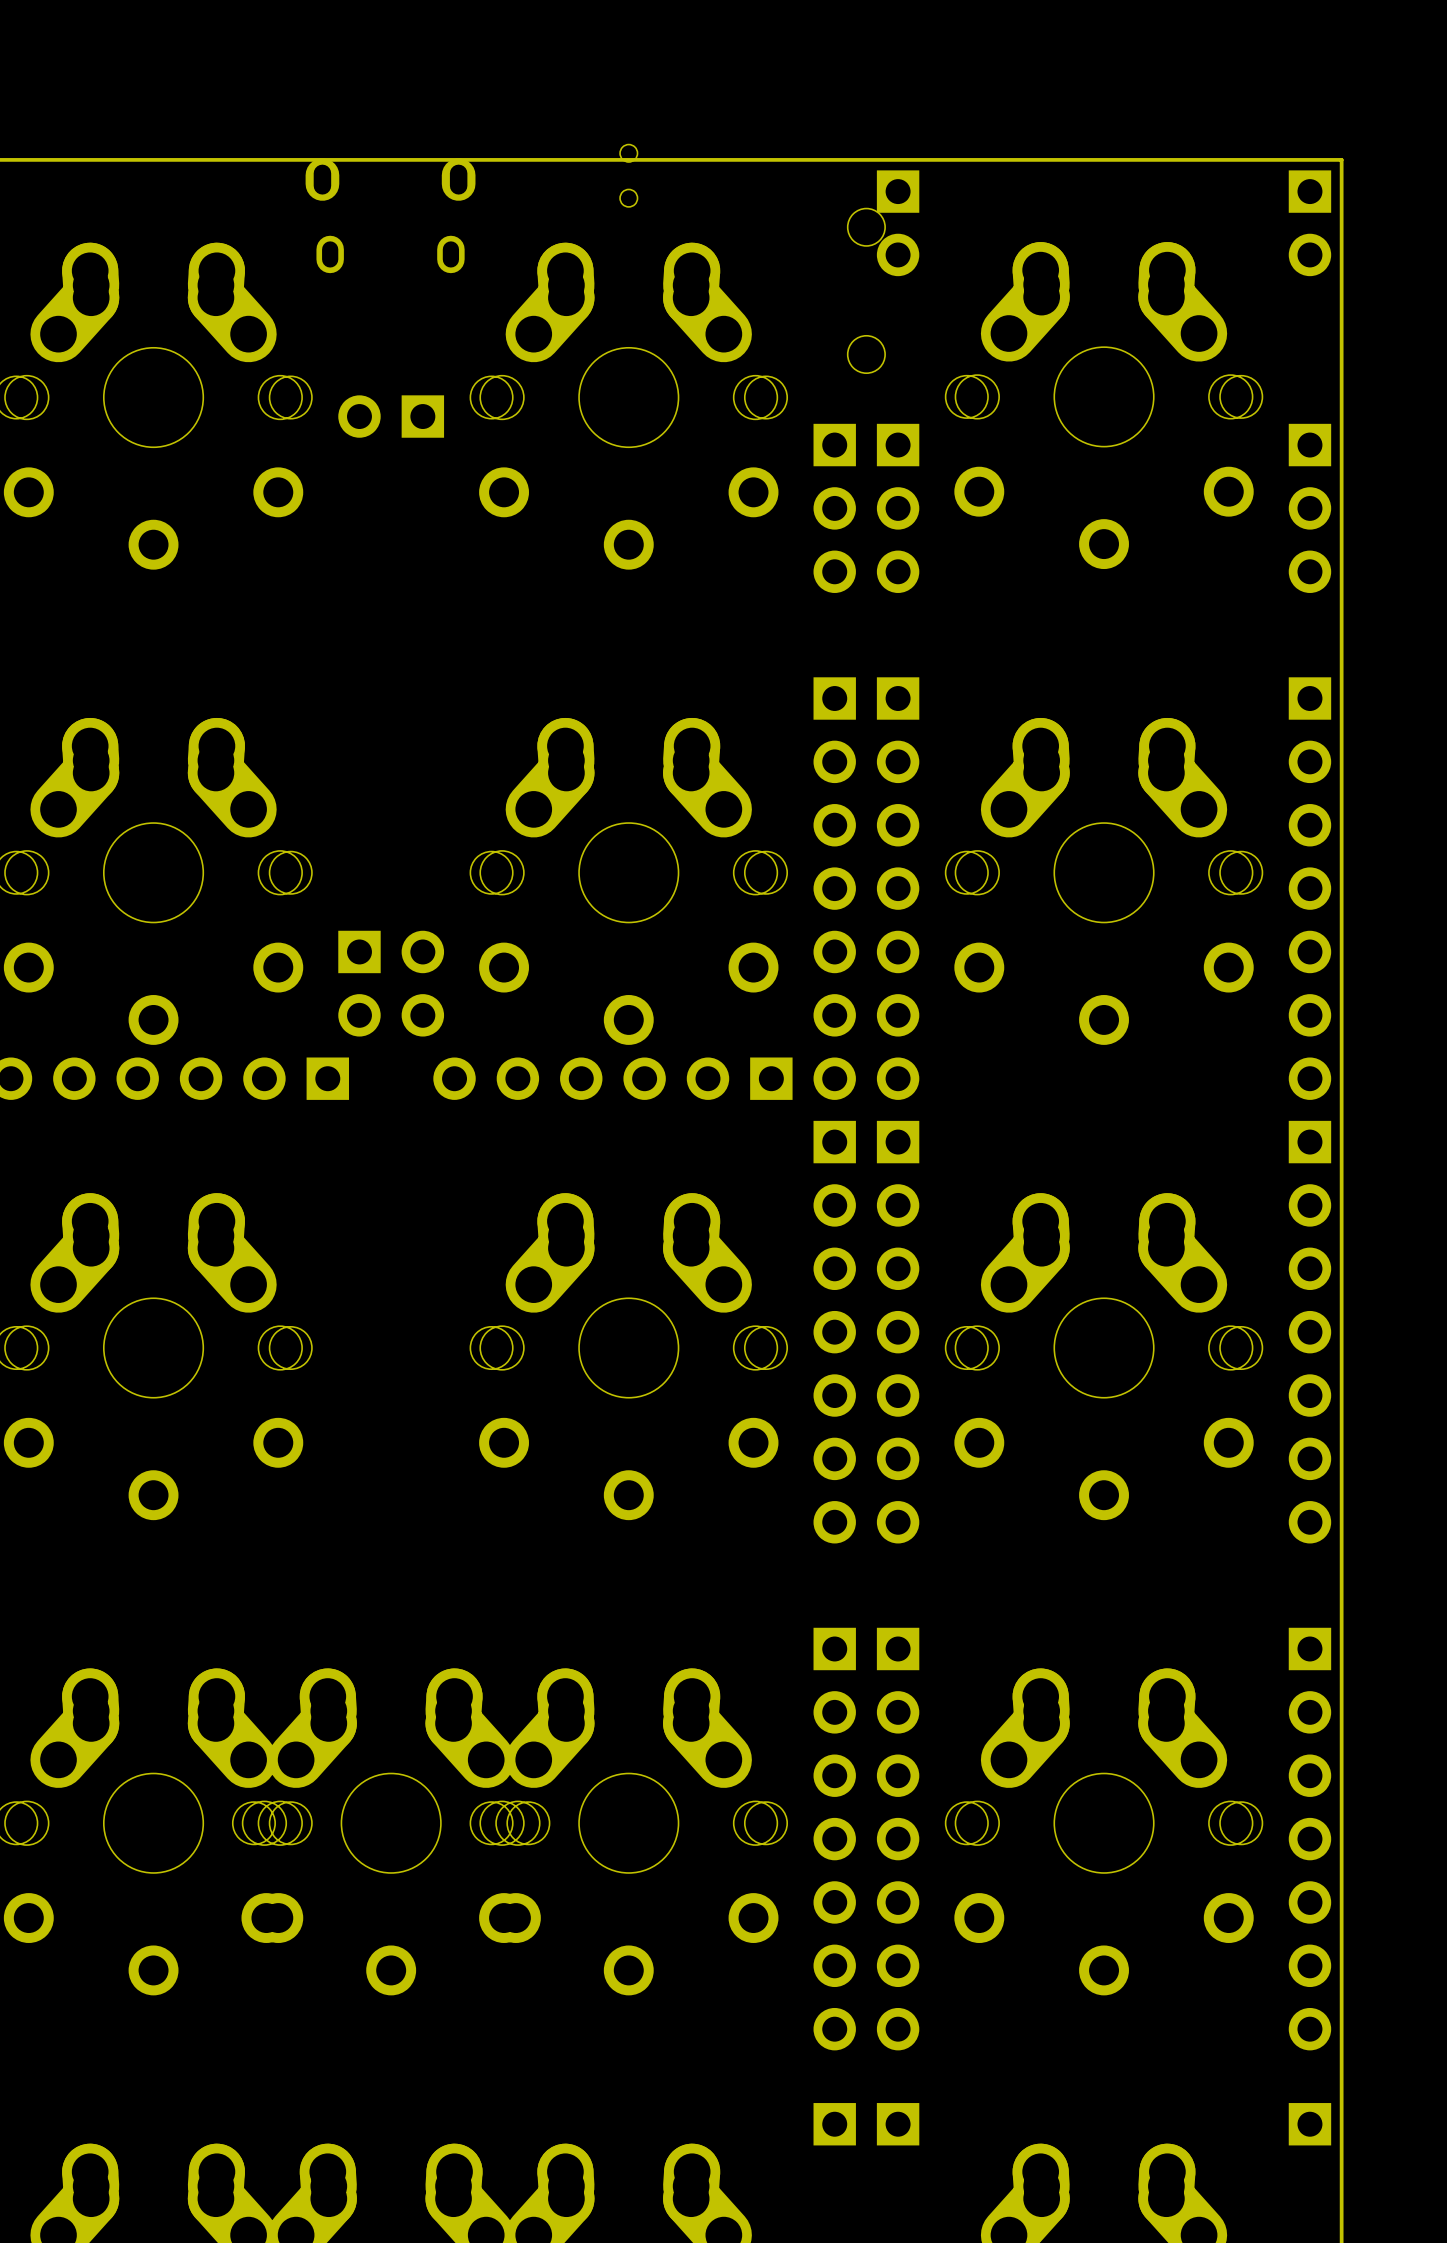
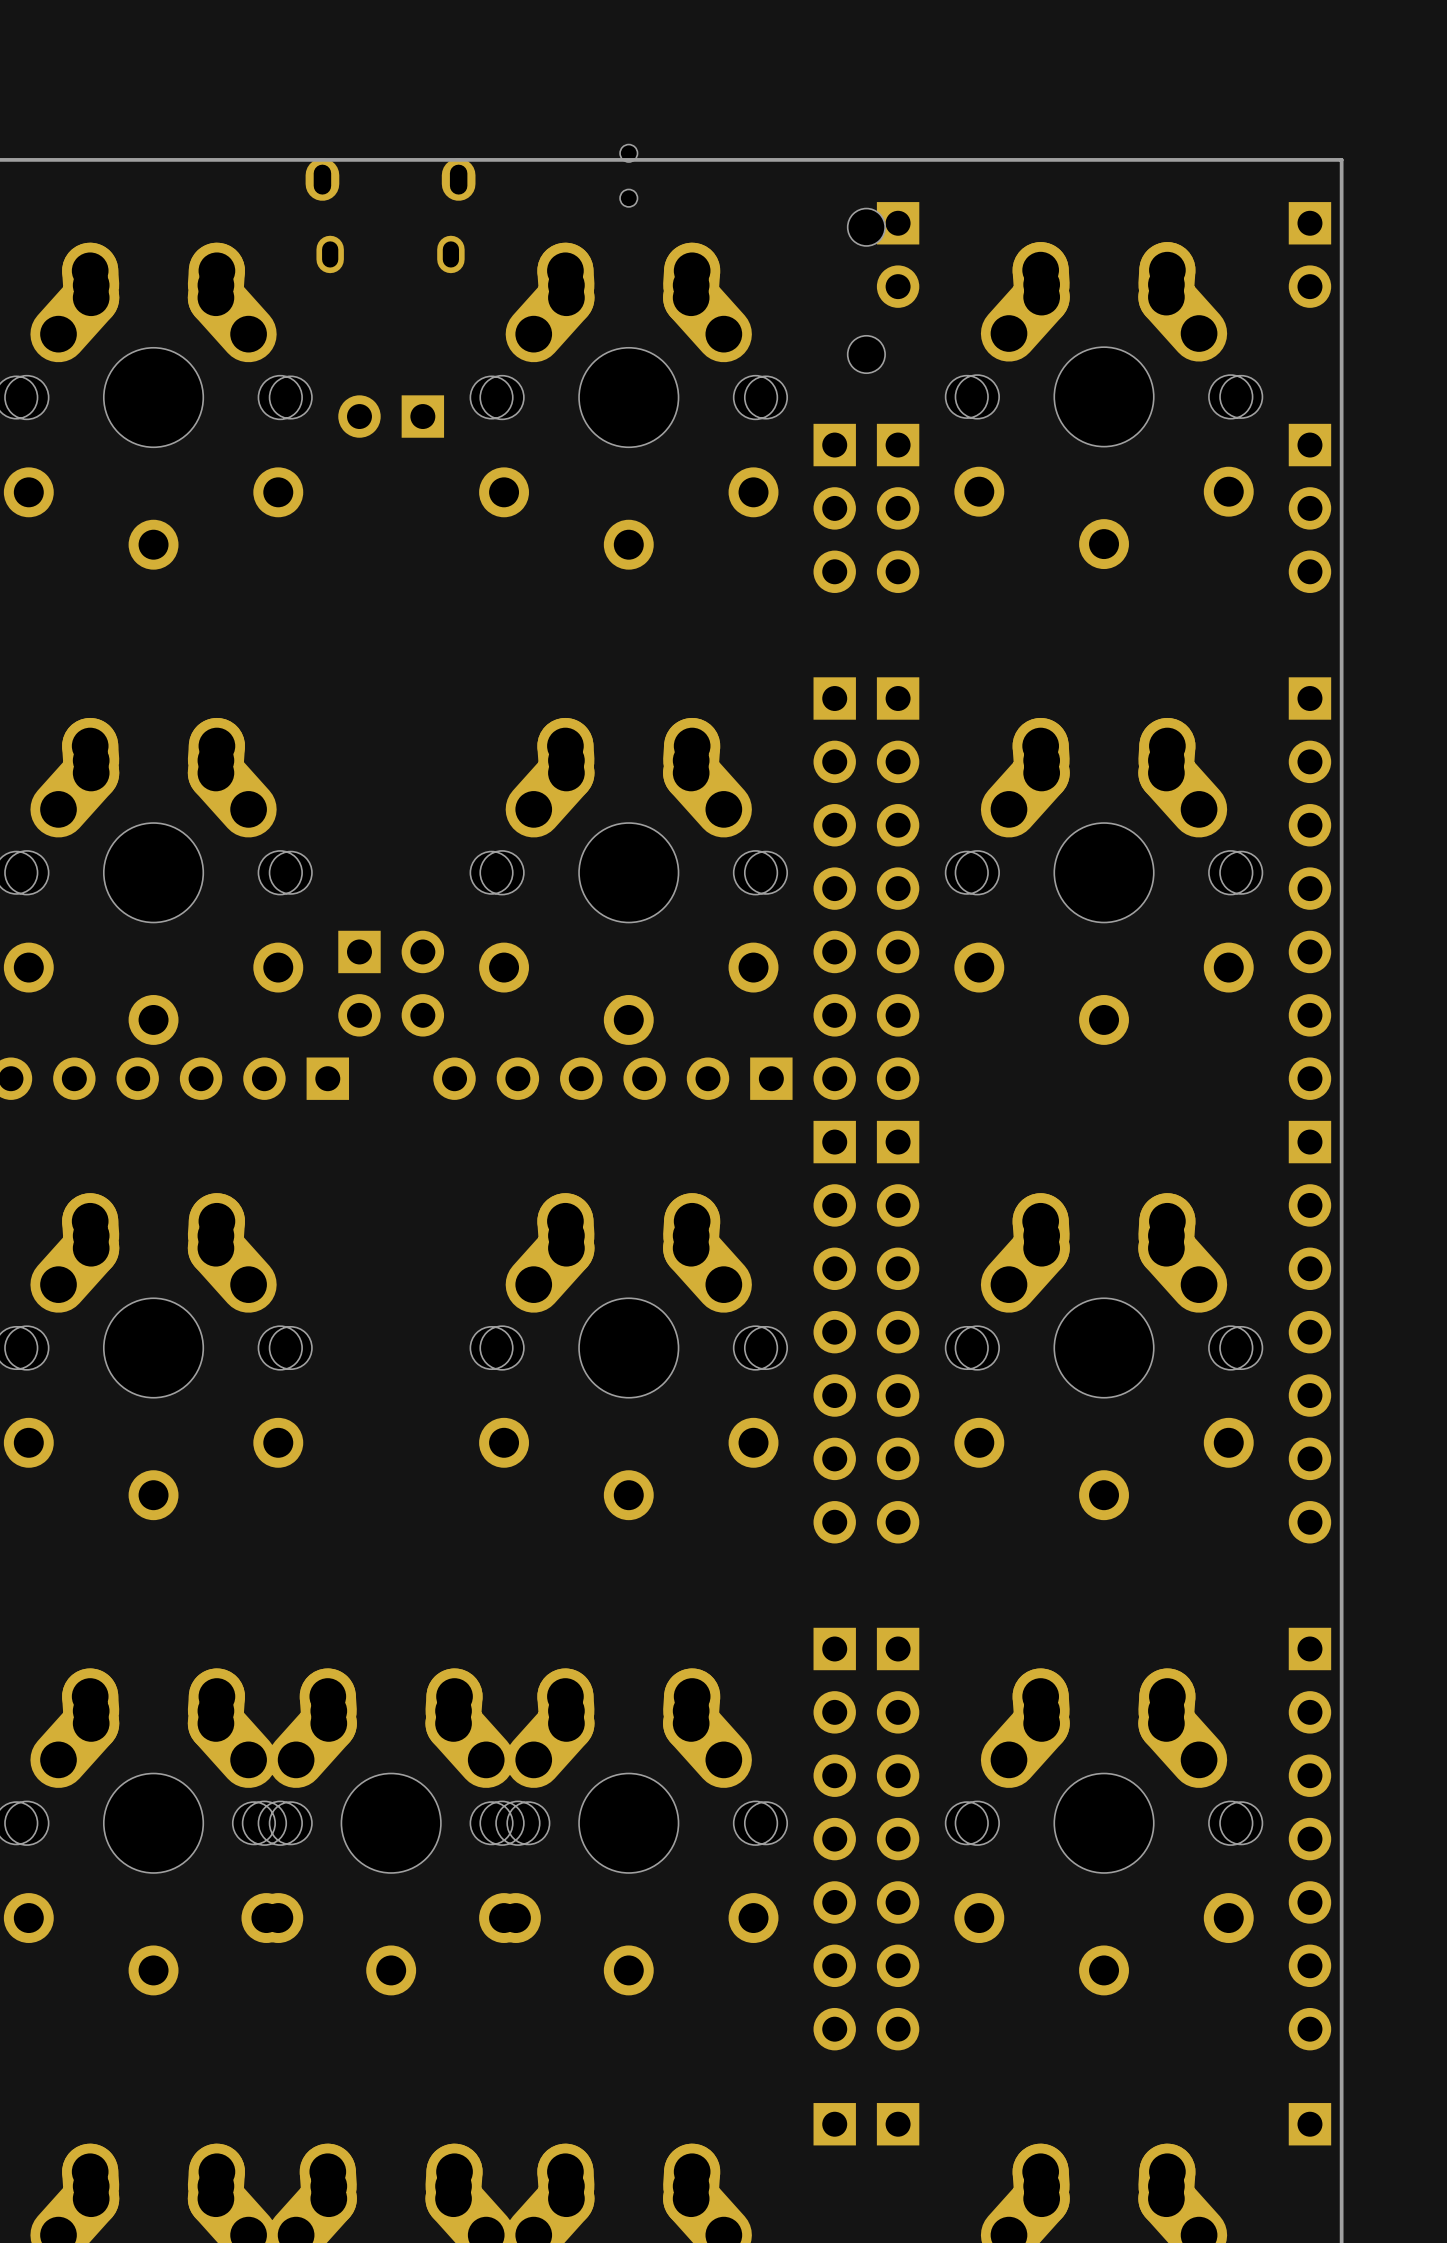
part position: (898, 223) -> (898, 254)
part position: (1309, 223) -> (1309, 254)

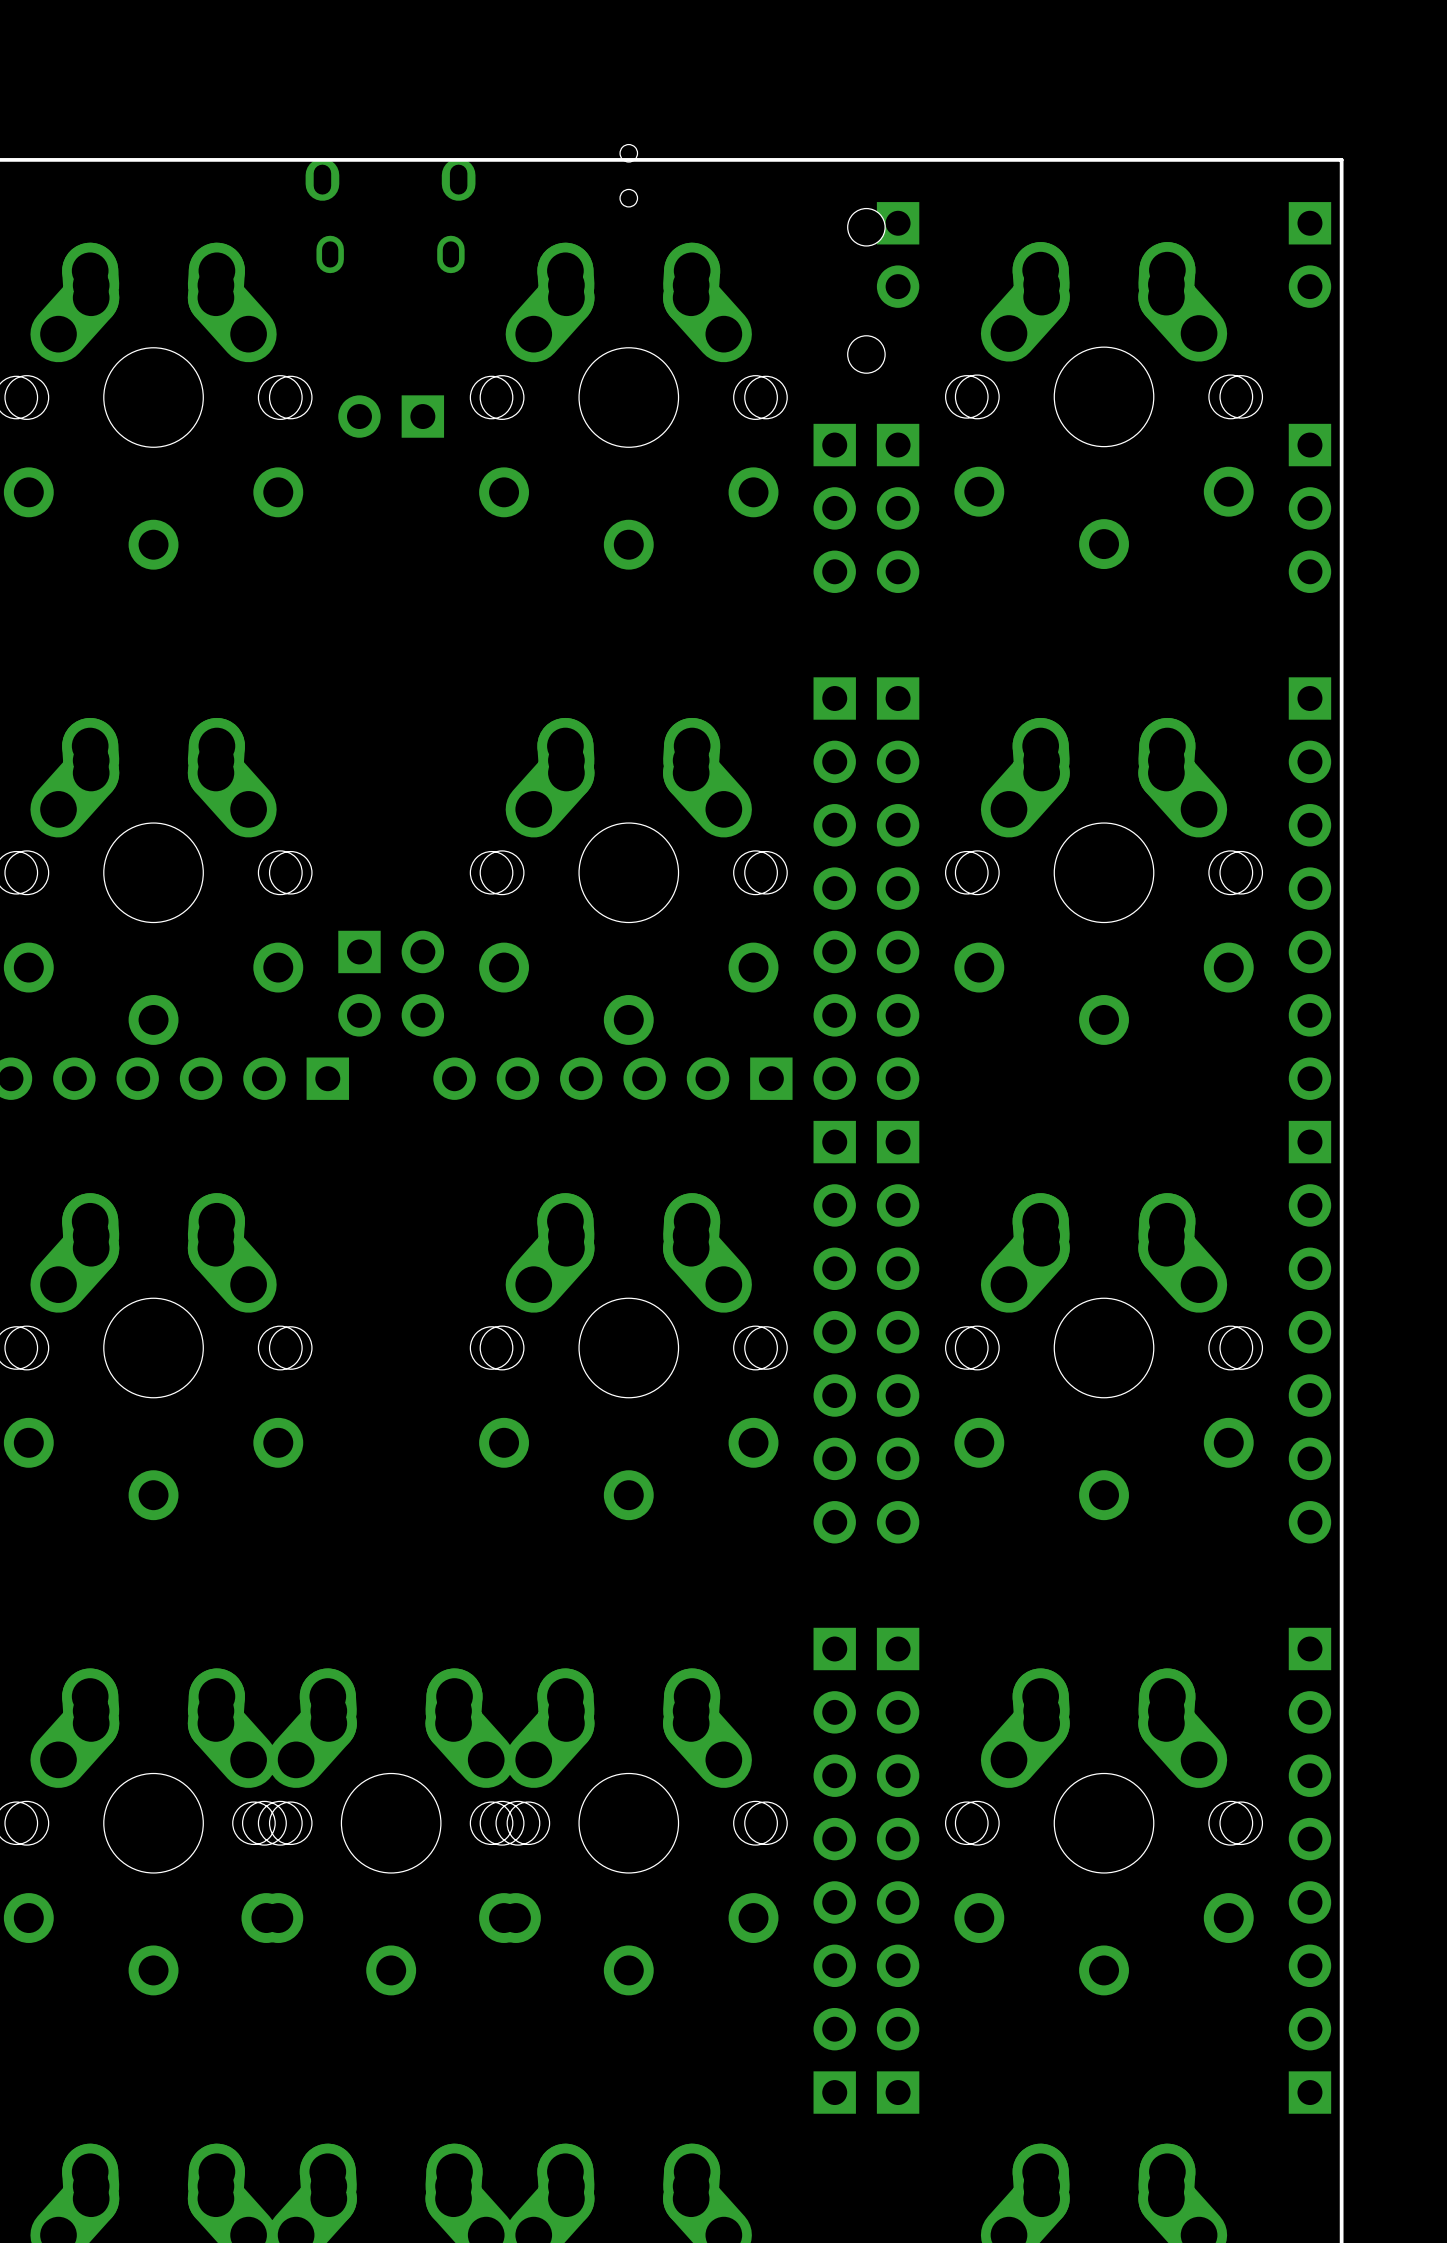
part position: (834, 2124) -> (834, 2092)
part position: (898, 2124) -> (898, 2092)
part position: (1309, 2124) -> (1309, 2092)

